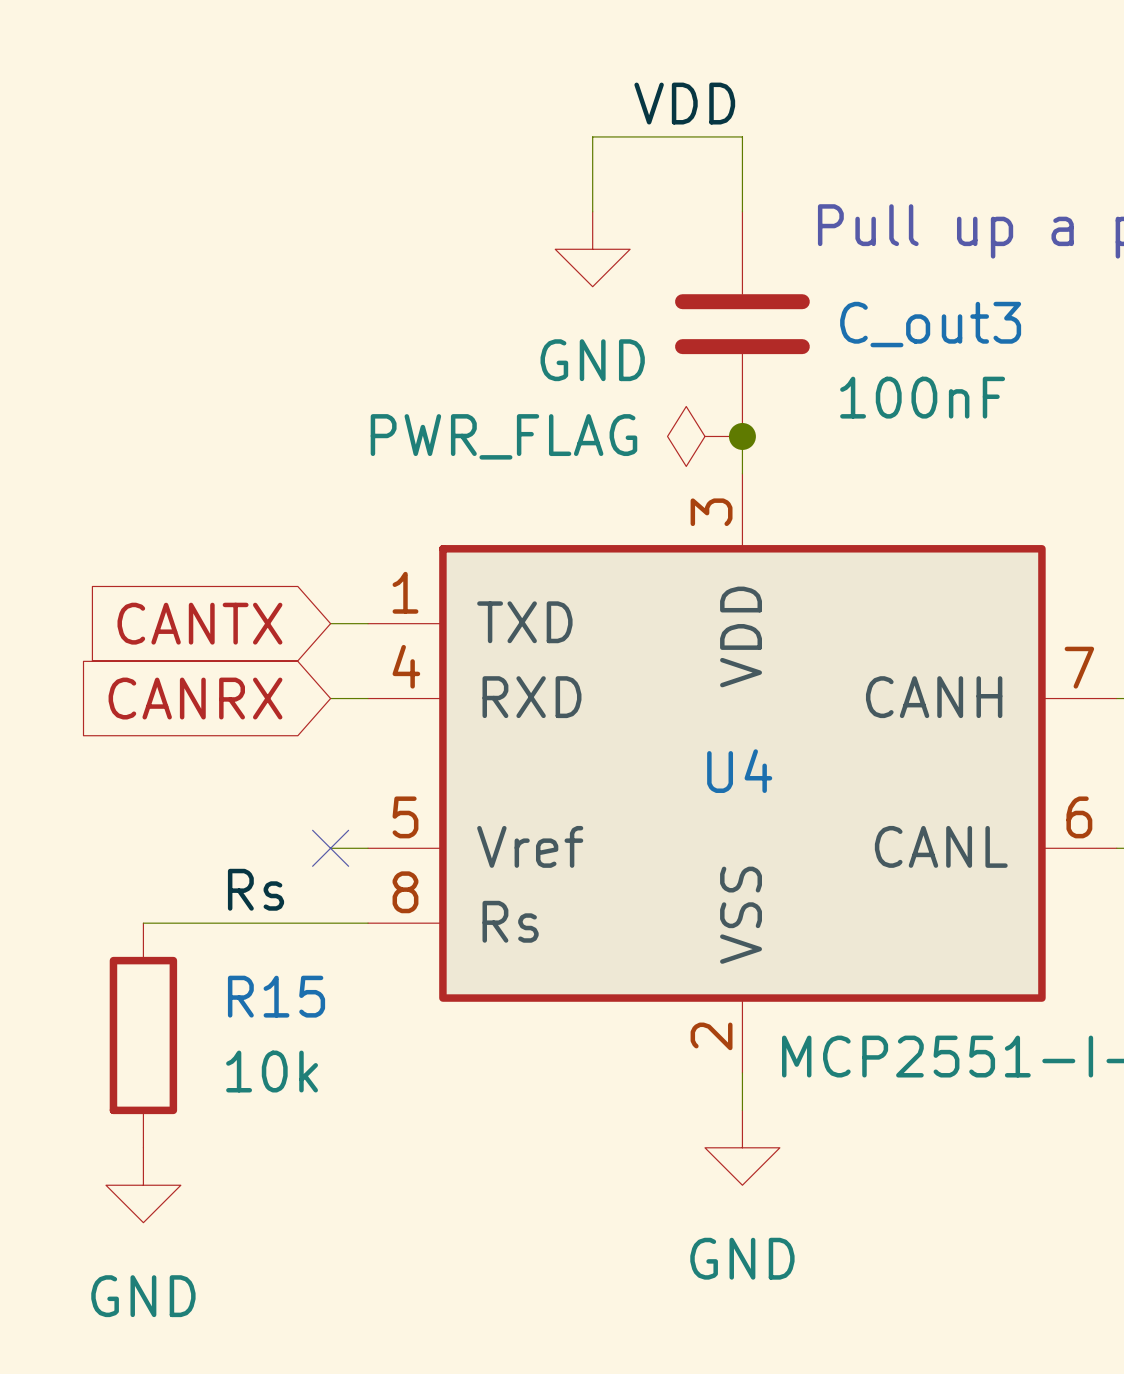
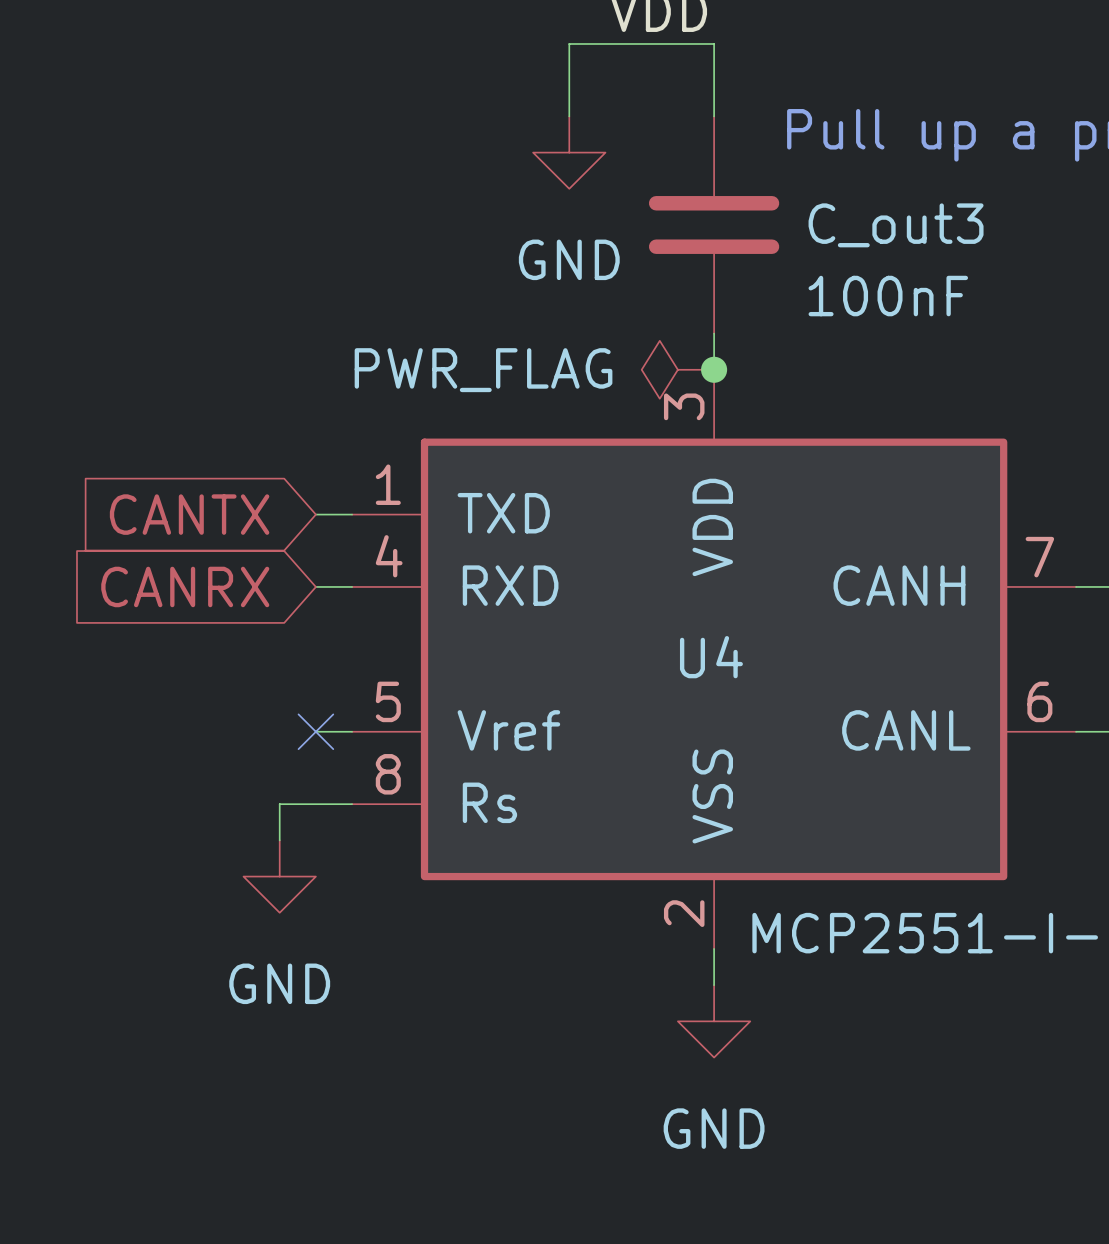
power symbol position: PWR_FLAG (704, 436) -> PWR_FLAG (677, 369)
junction position: (742, 436) -> (714, 369)
label: Rs (256, 889) -> none
wire: (143, 923) (293, 923) -> (279, 840) (279, 804)
R15: 10k (143, 1035) -> none
power symbol position: GND (143, 1185) -> GND (279, 876)

